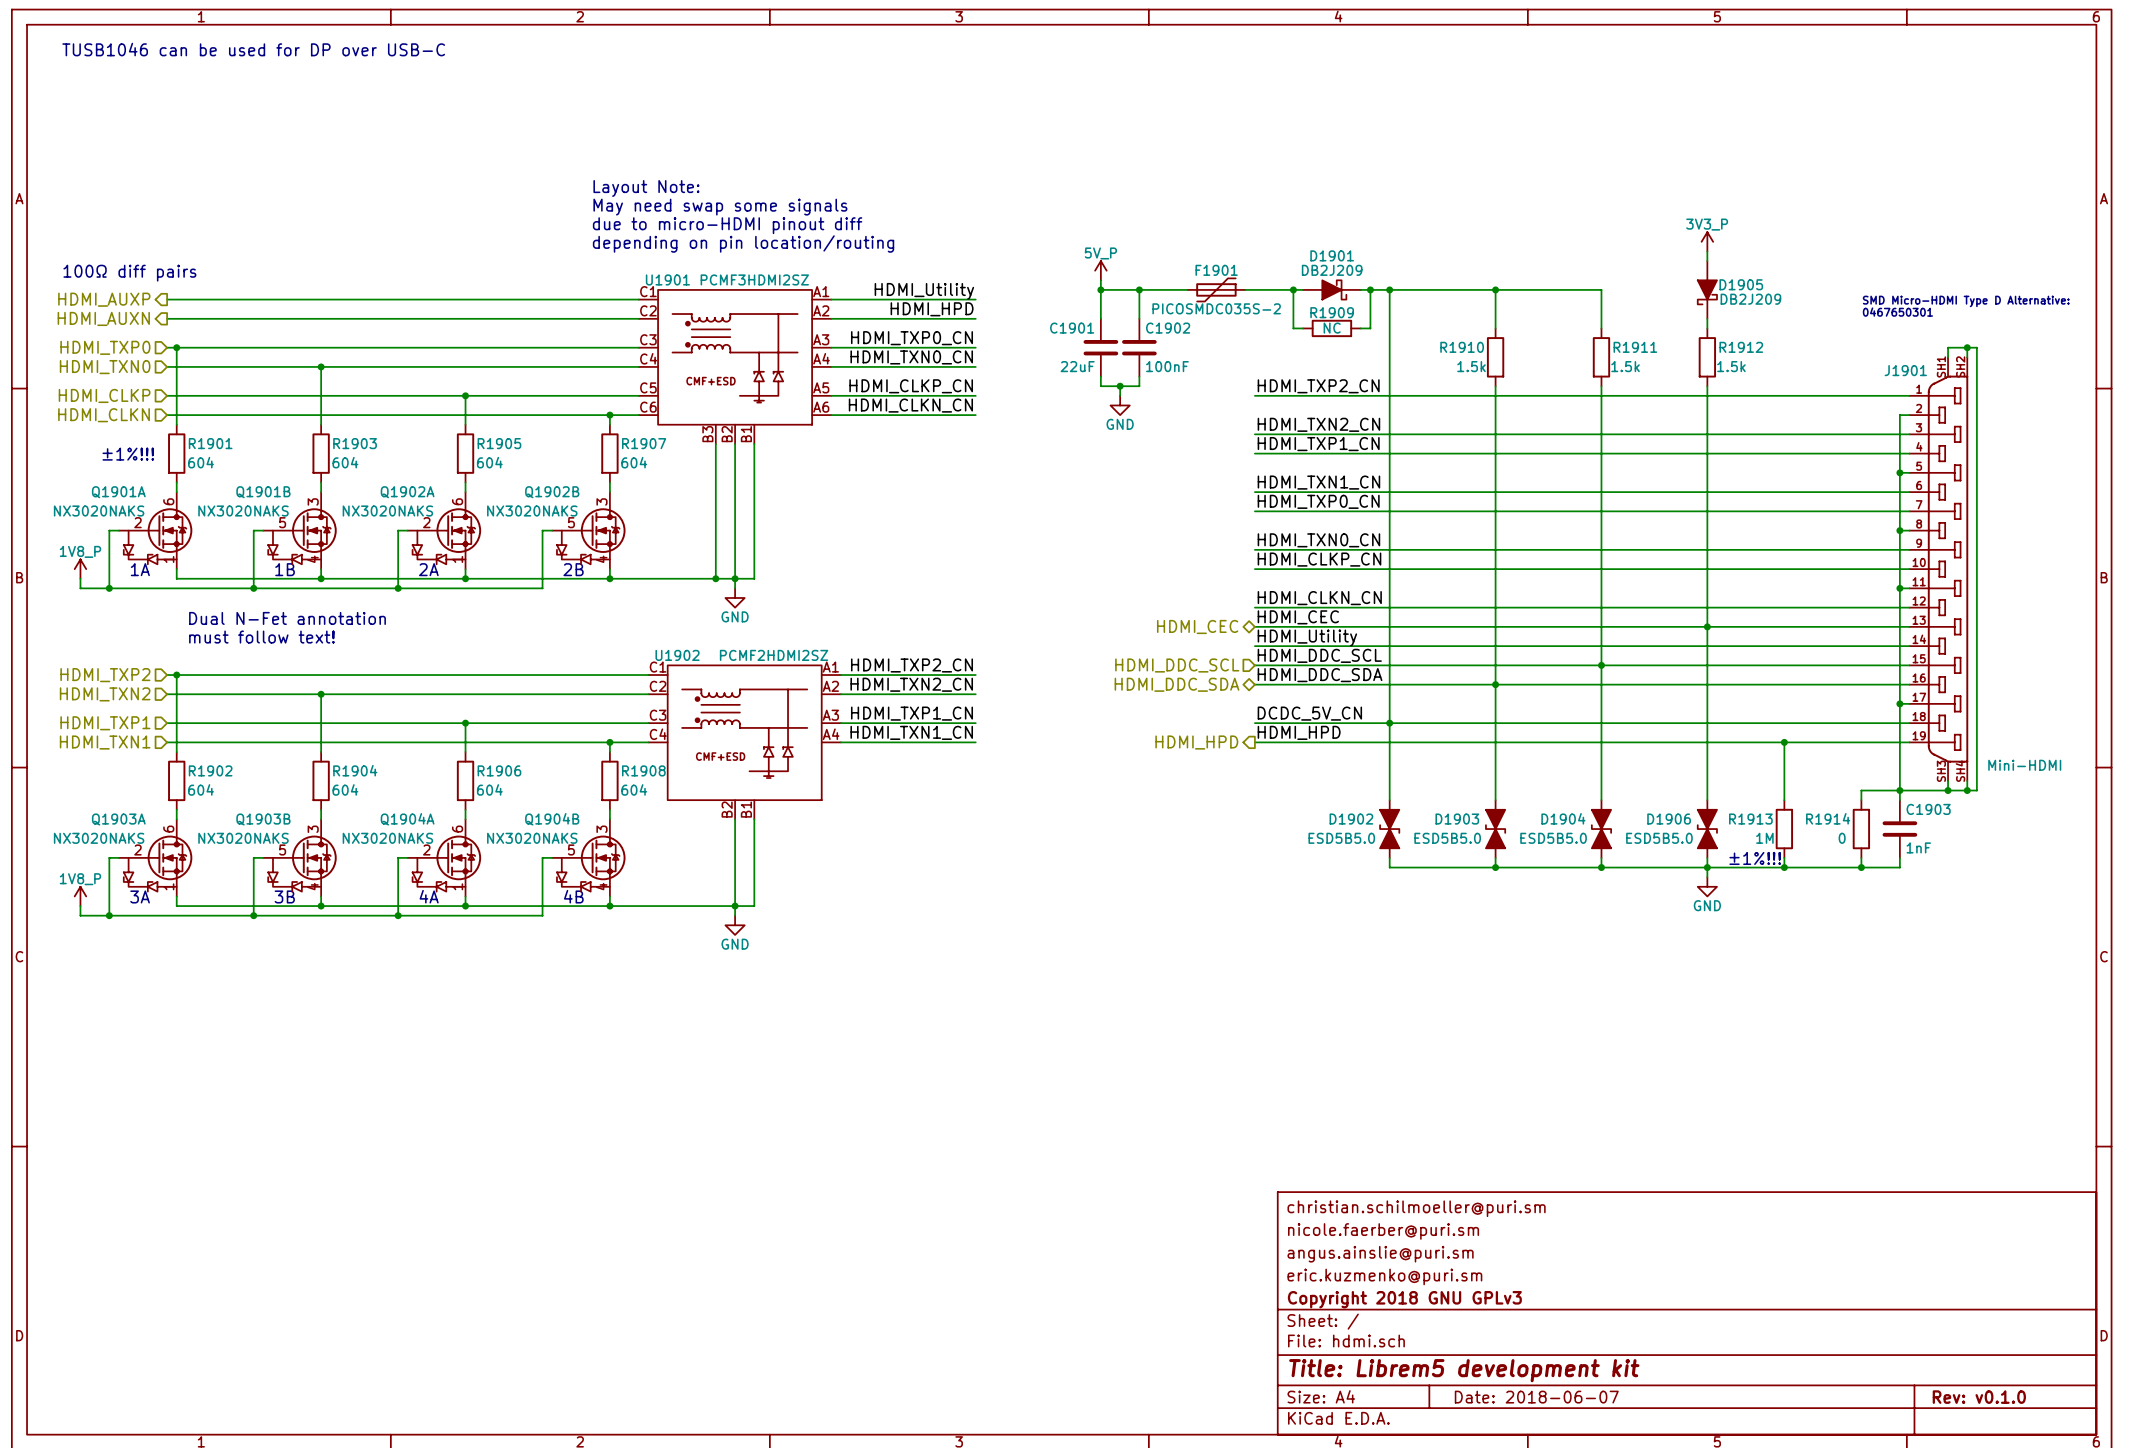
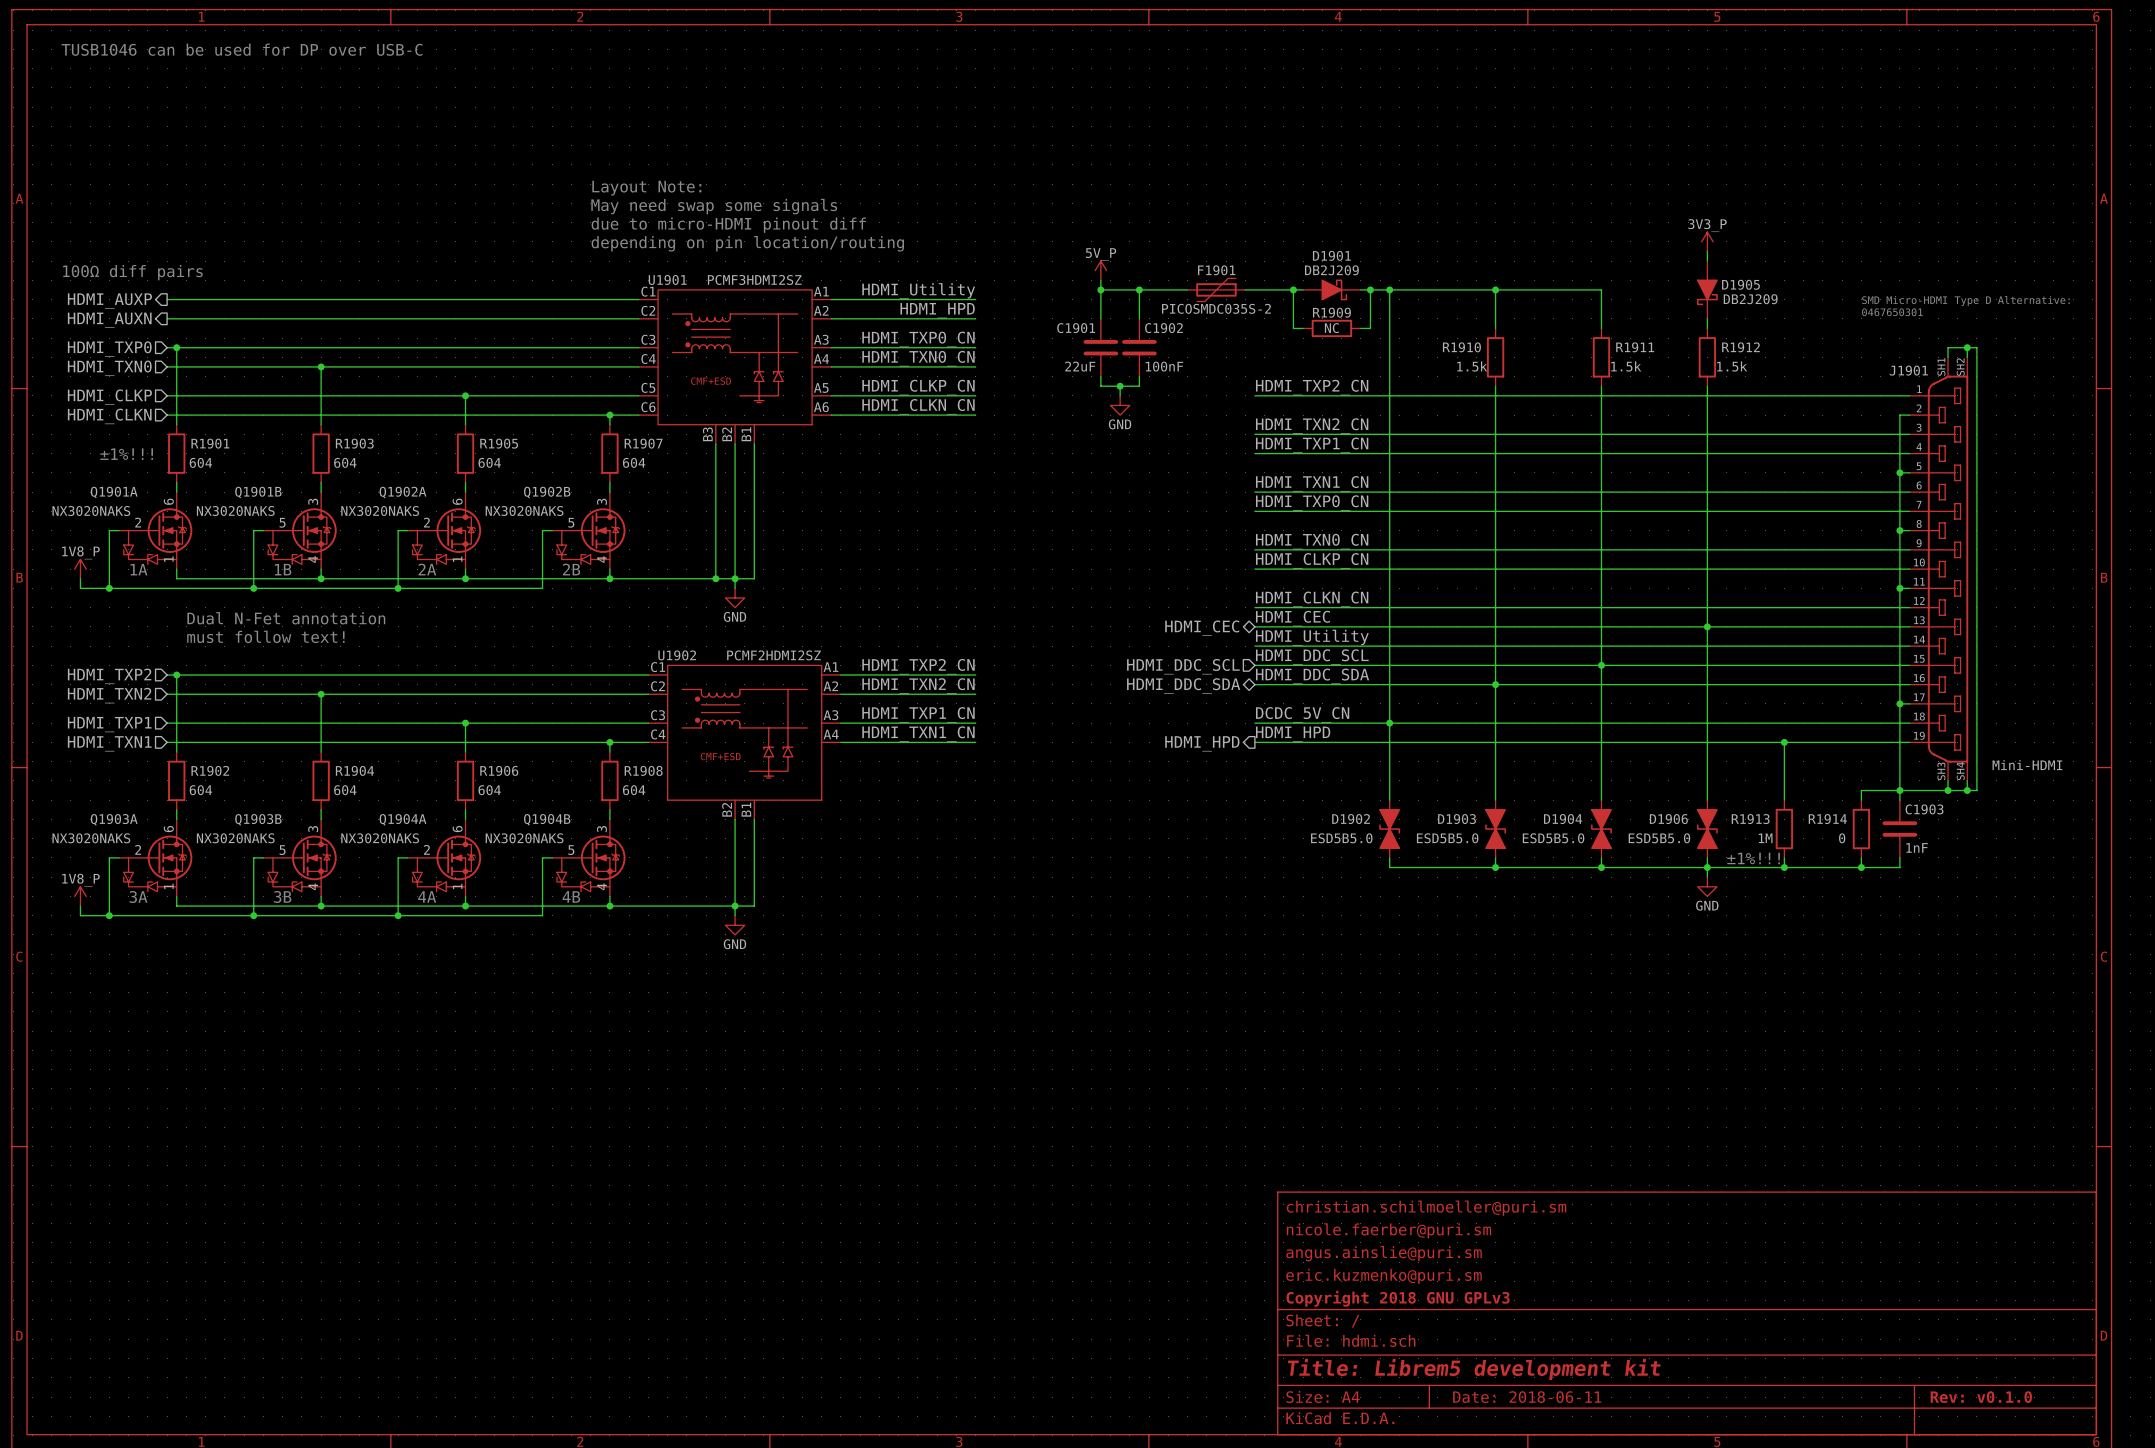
title block: Date: 2018-06-07 (1536, 1397) -> Date: 2018-06-11 (1527, 1397)

